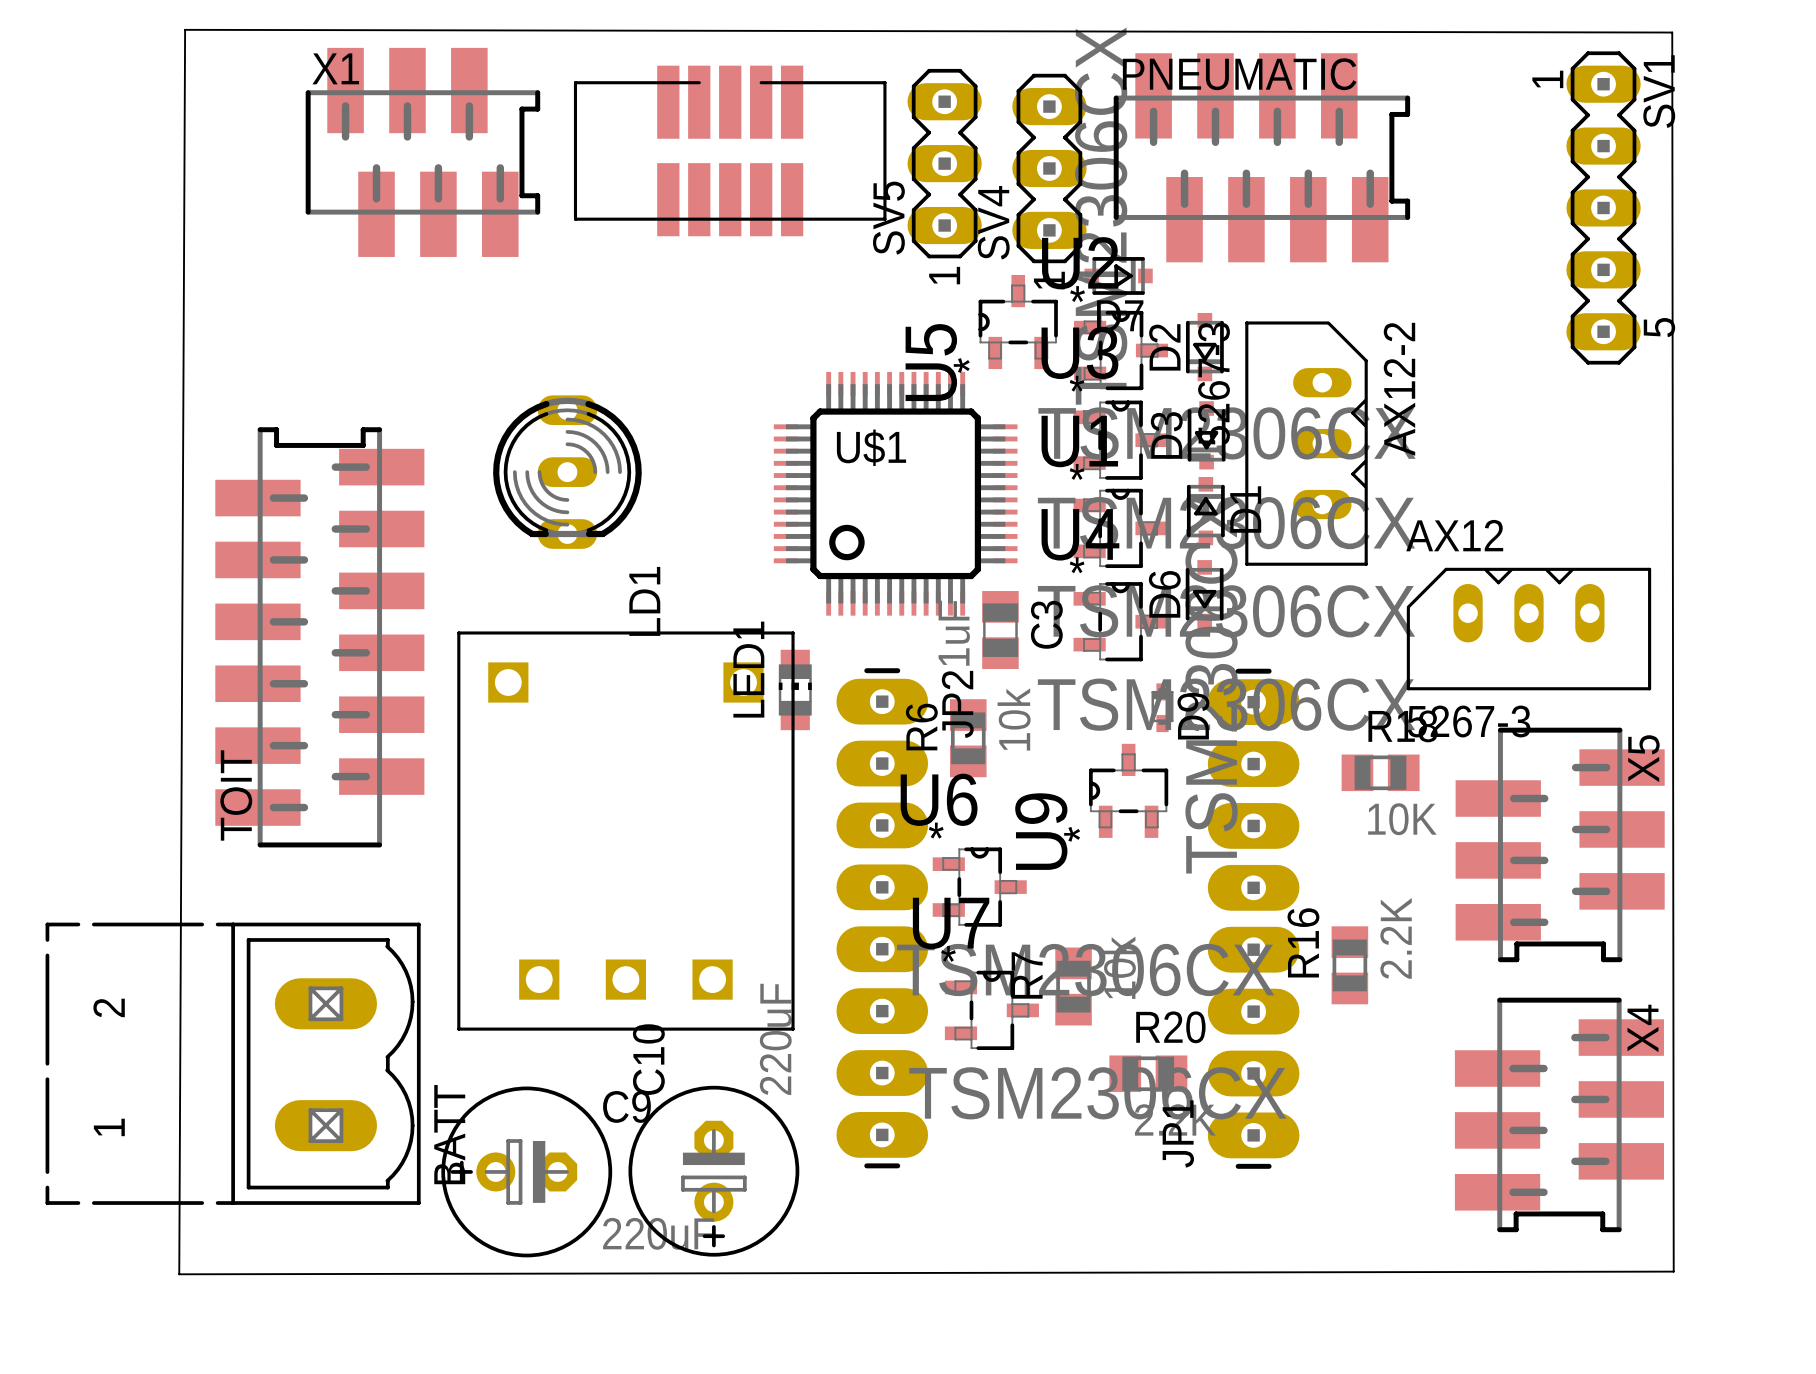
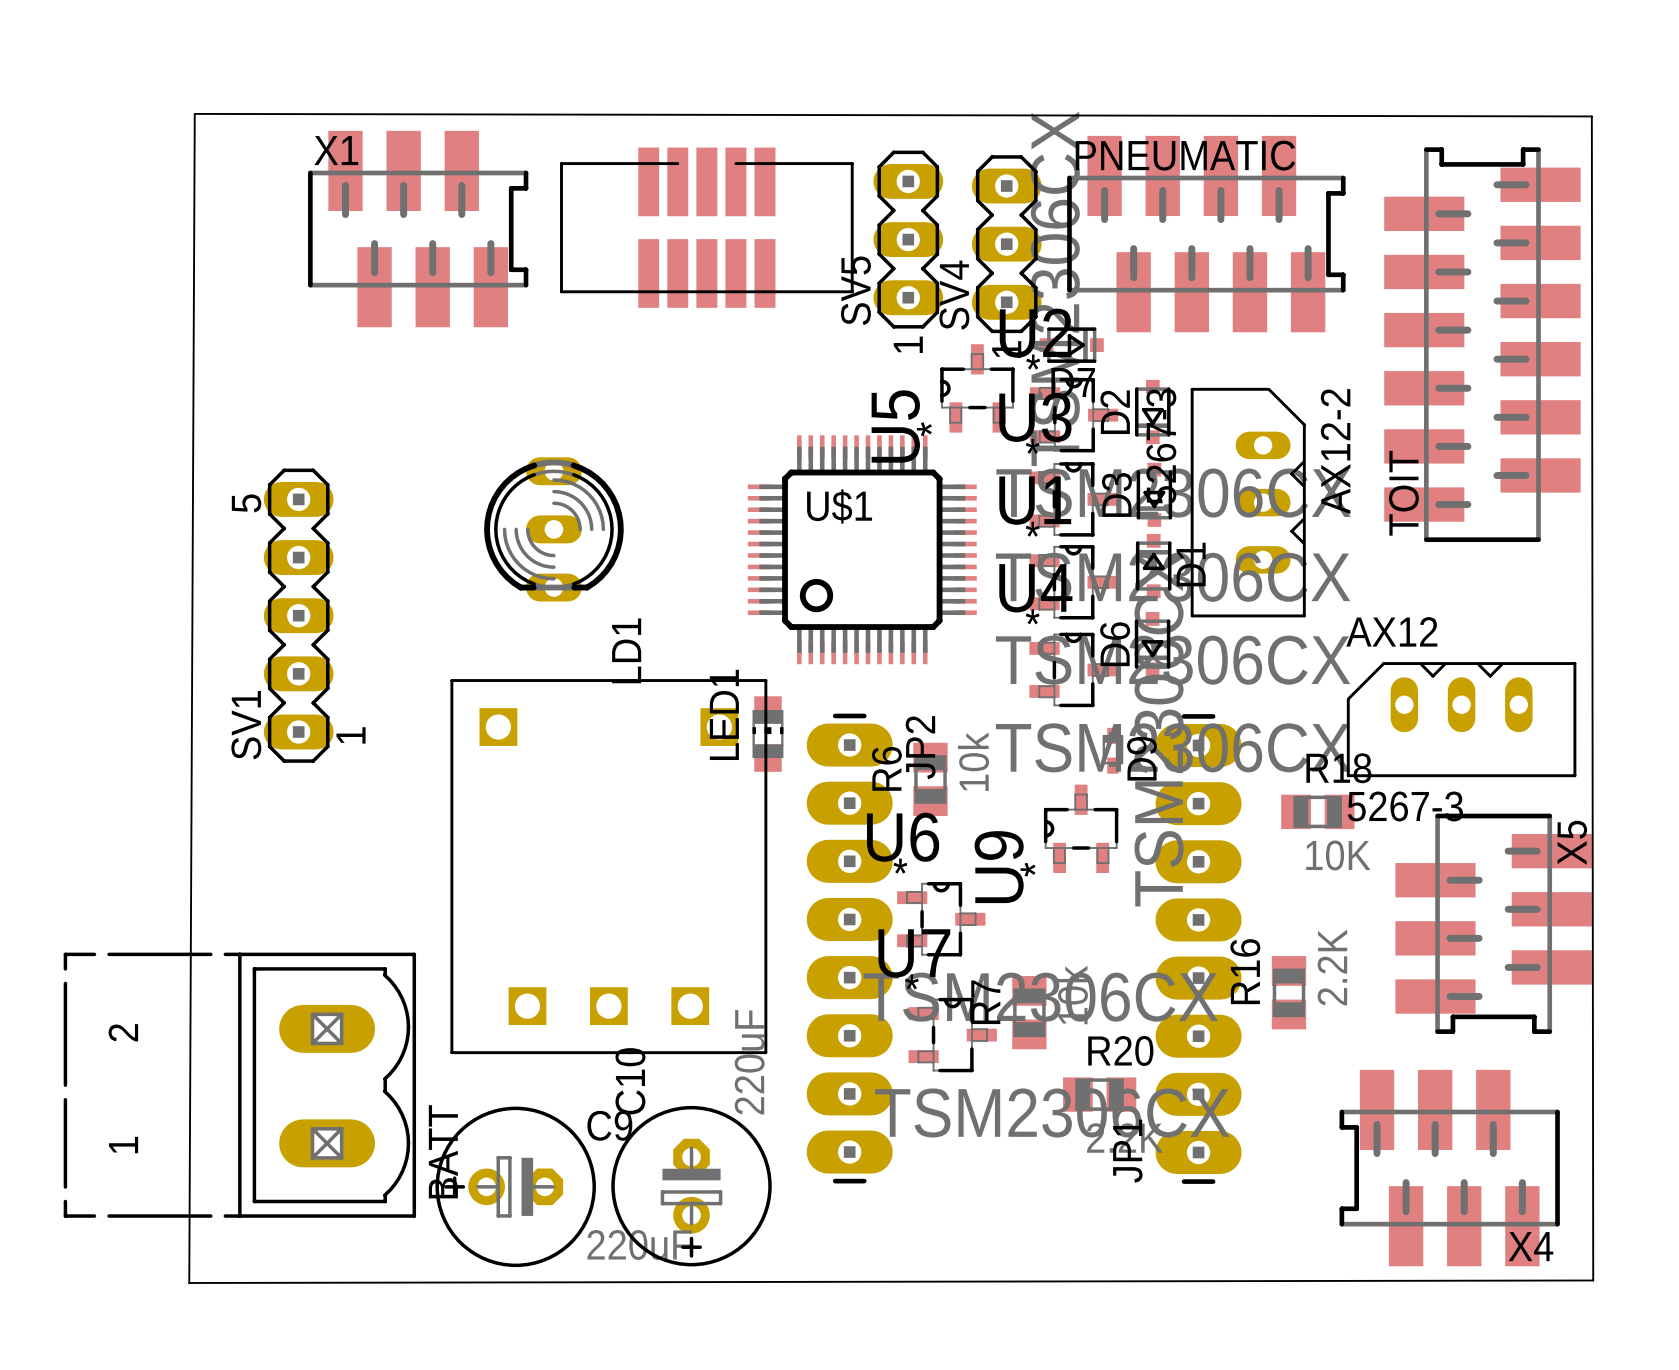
SV1 text position: 1 (1547, 79) -> 1 (351, 735)
SV1 name position: SV1 (1659, 91) -> SV1 (246, 725)
SV1 position: (1603, 207) -> (298, 615)
TOIT: none -> (1482, 344)
SV1 text position: 5 (1659, 327) -> 5 (246, 503)
AX12 position: (1528, 629) -> (1461, 719)
C3: 1uF (1000, 630) -> none
TOIT: (319, 637) -> none
X5 position: (1560, 844) -> (1493, 923)
X4 rotation: 0° (1559, 1114) -> 90° clockwise (1449, 1168)

